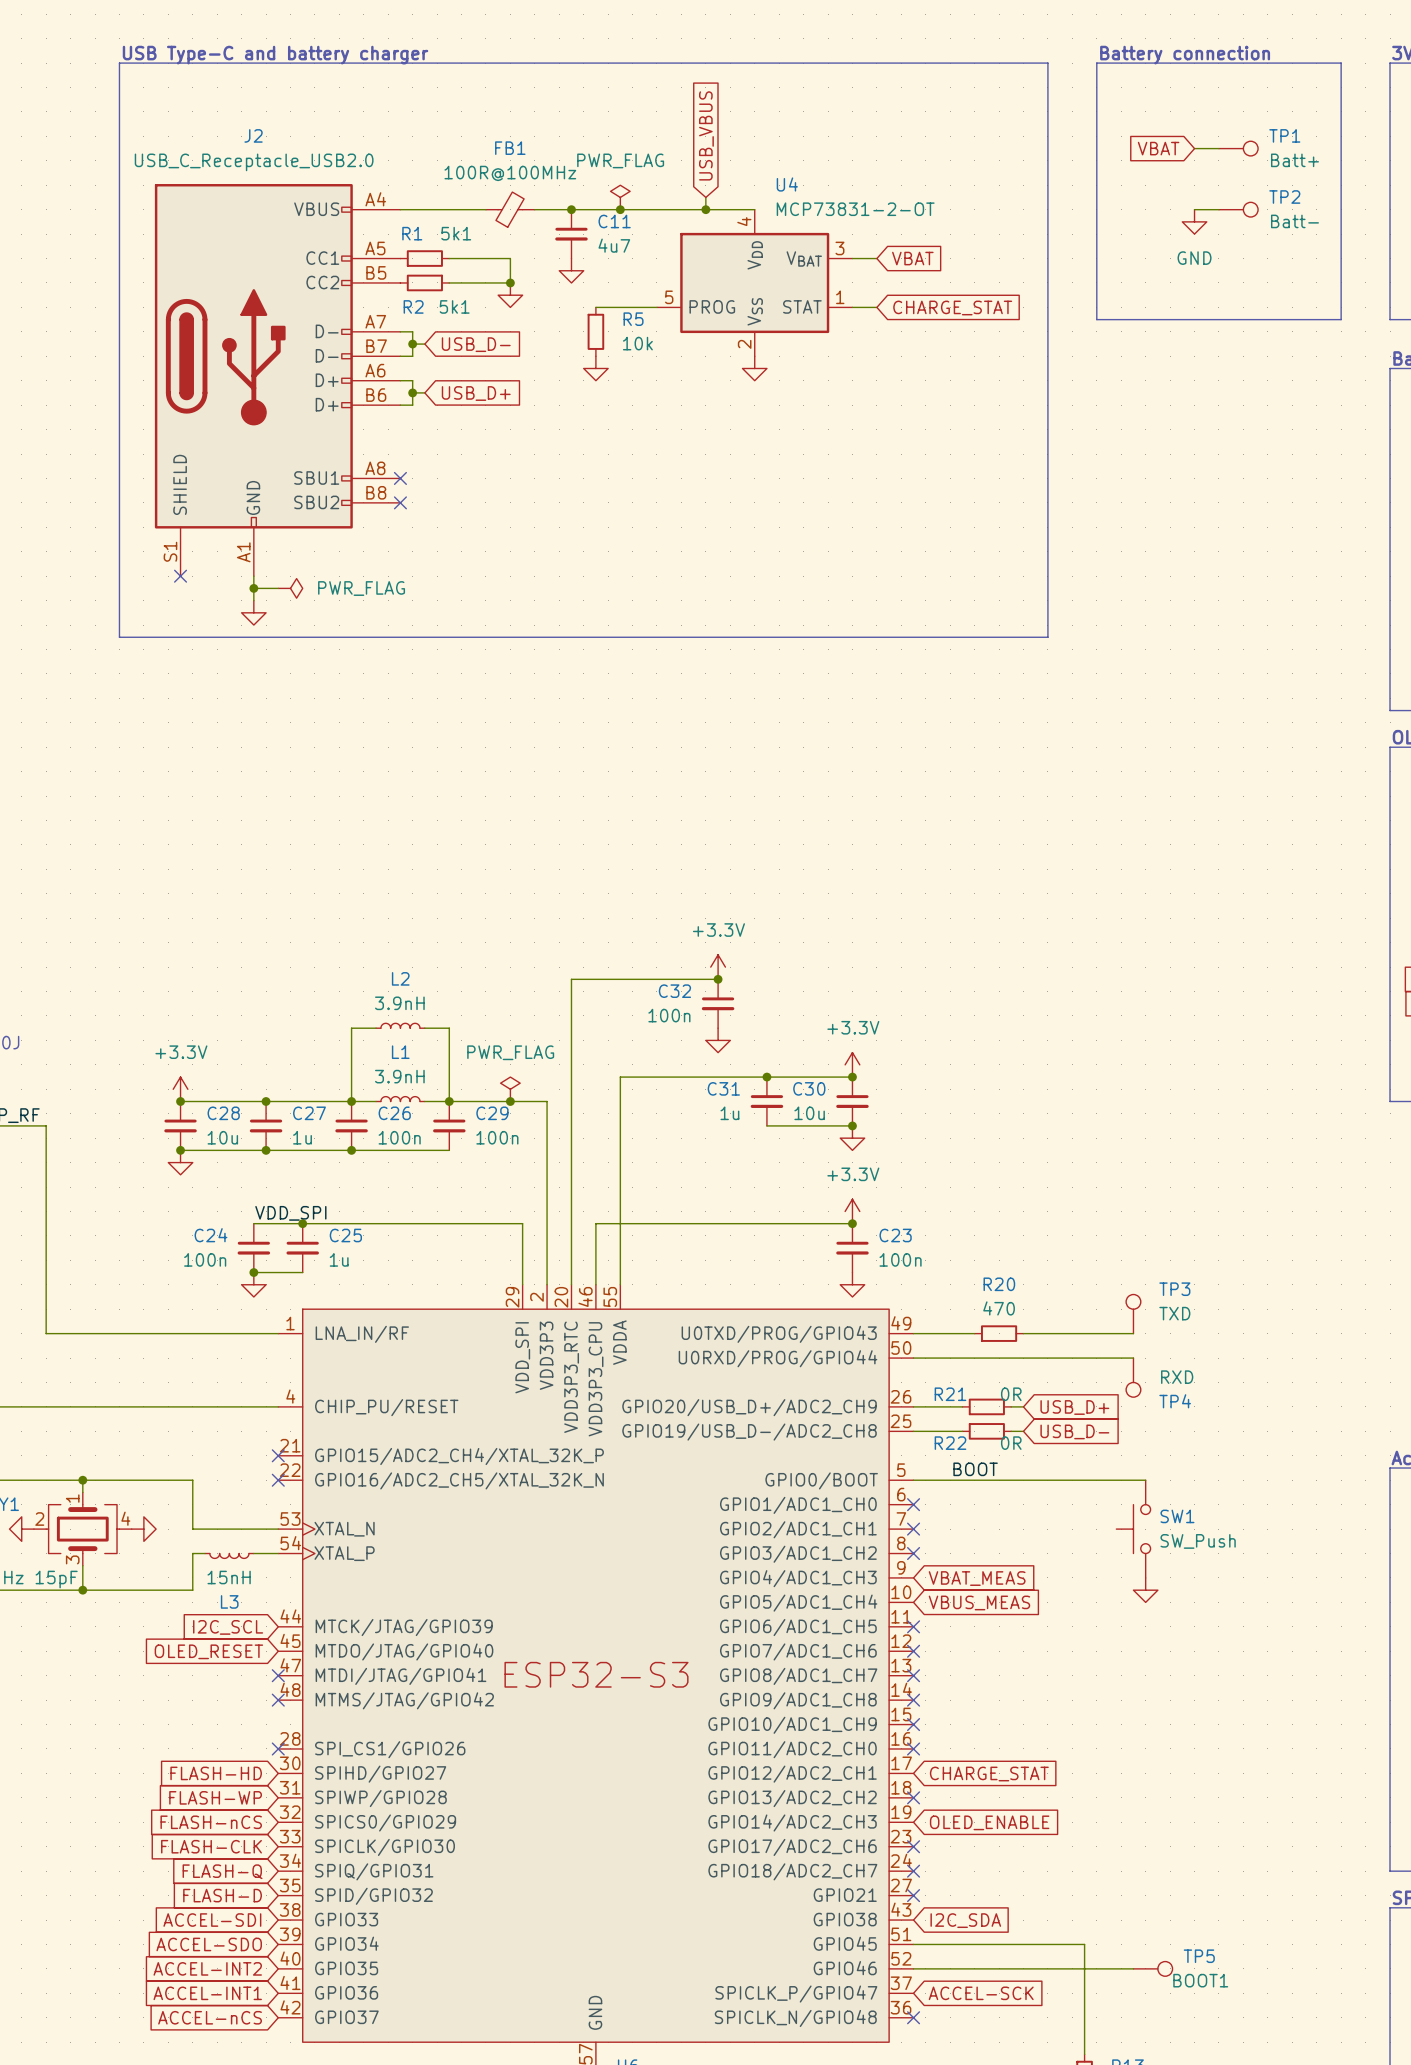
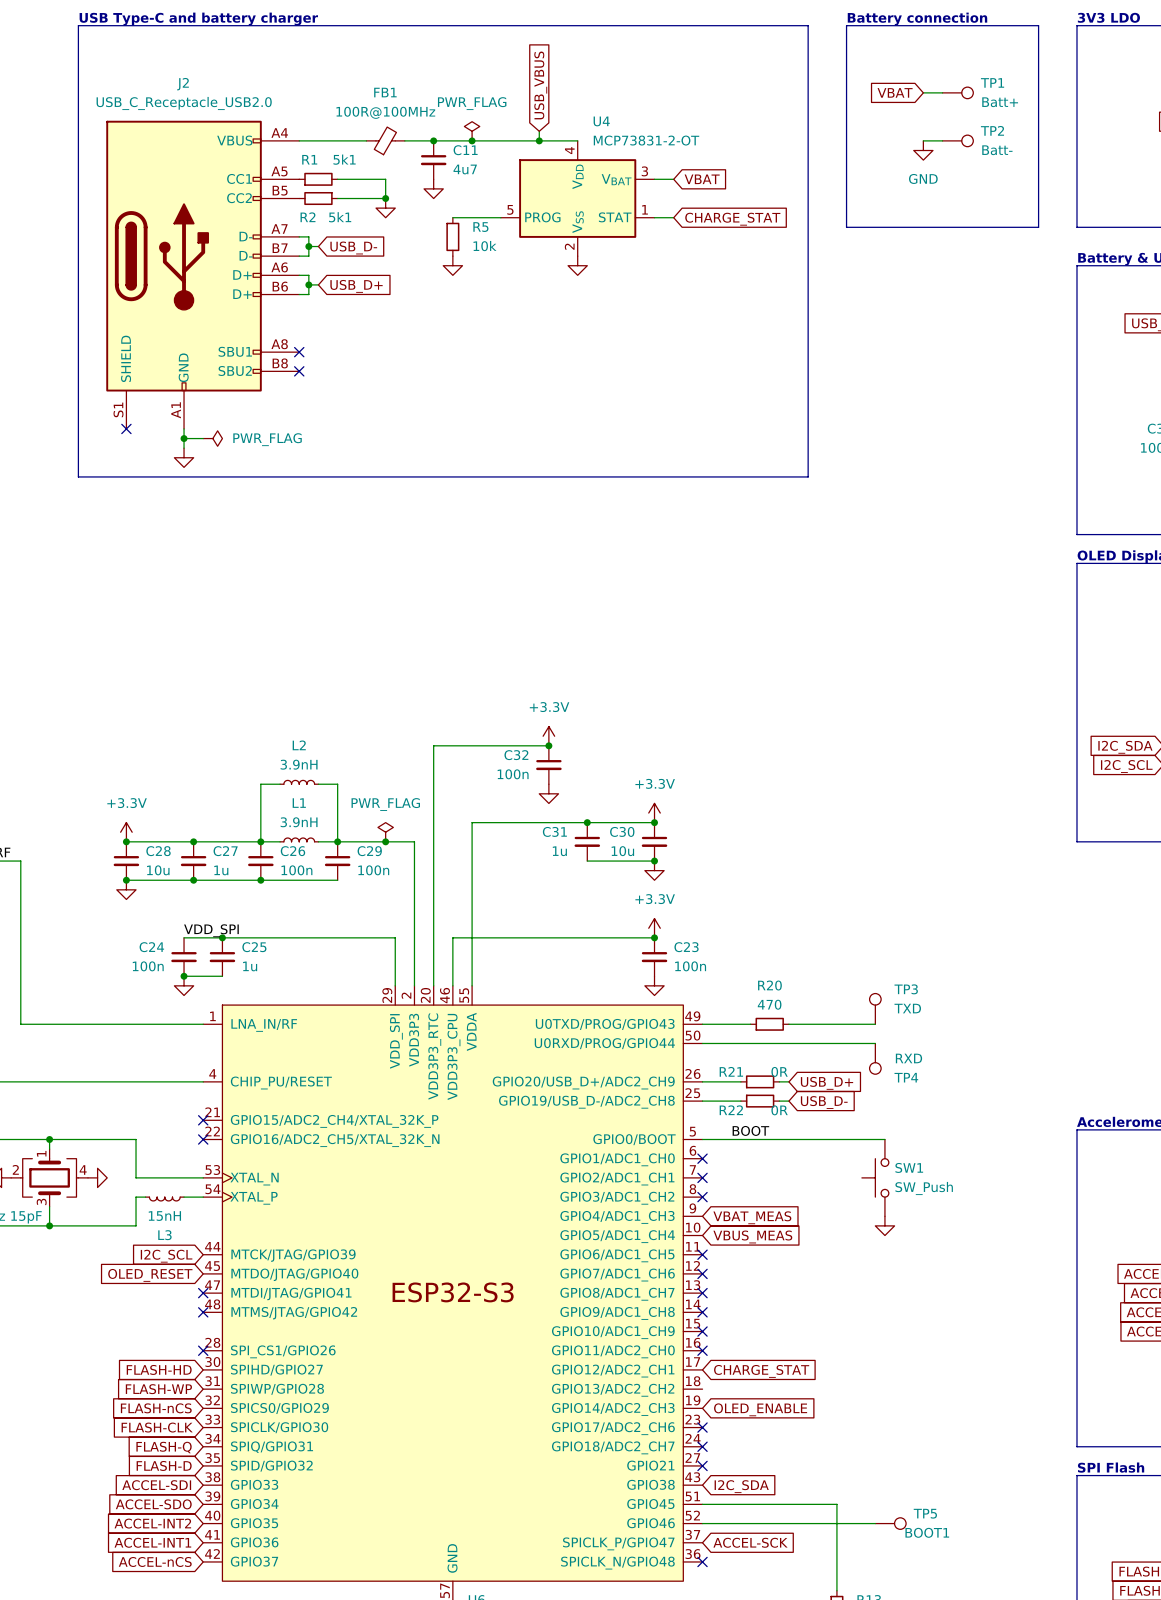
no-connect mark: (913, 1797) -> none

